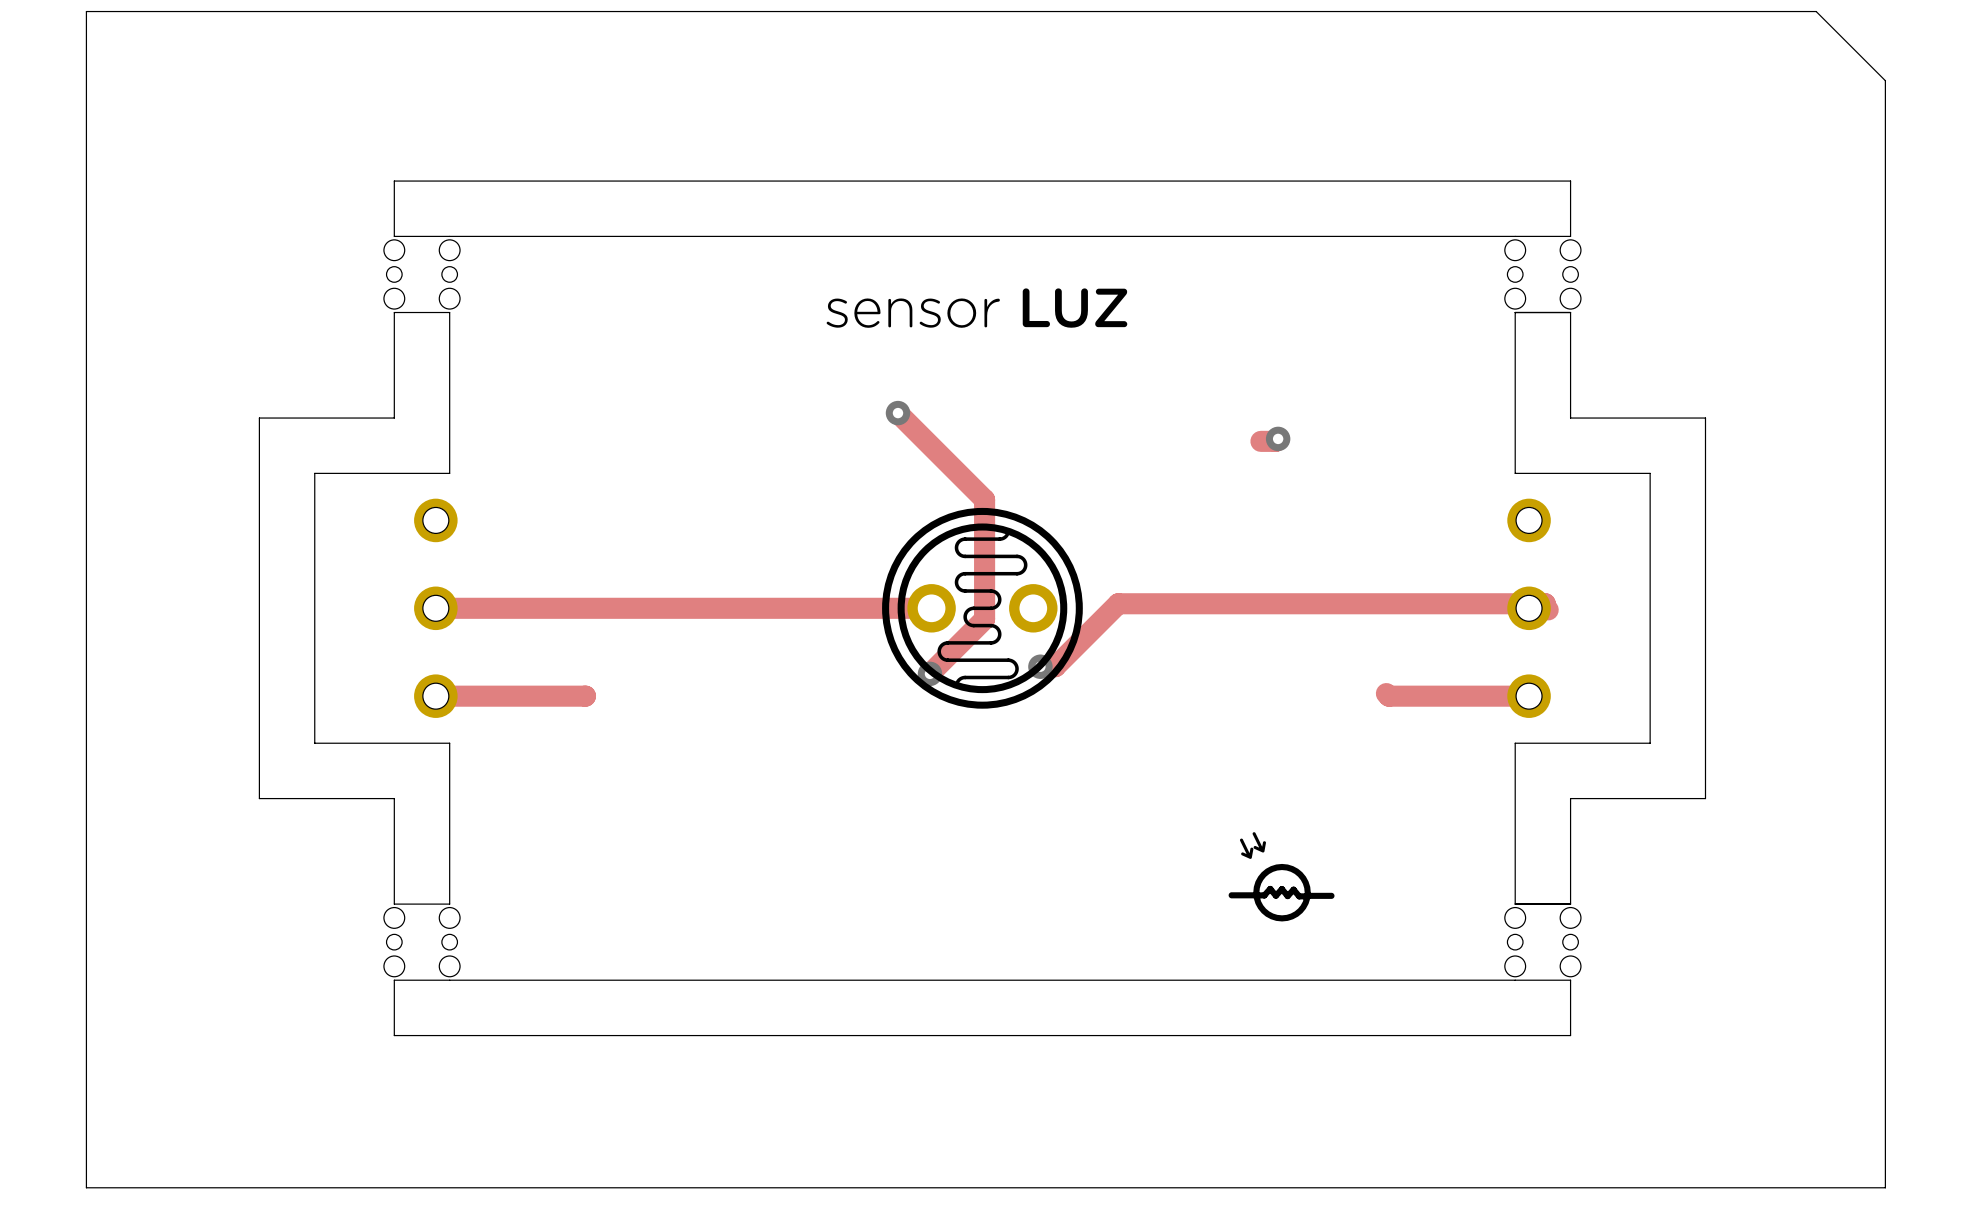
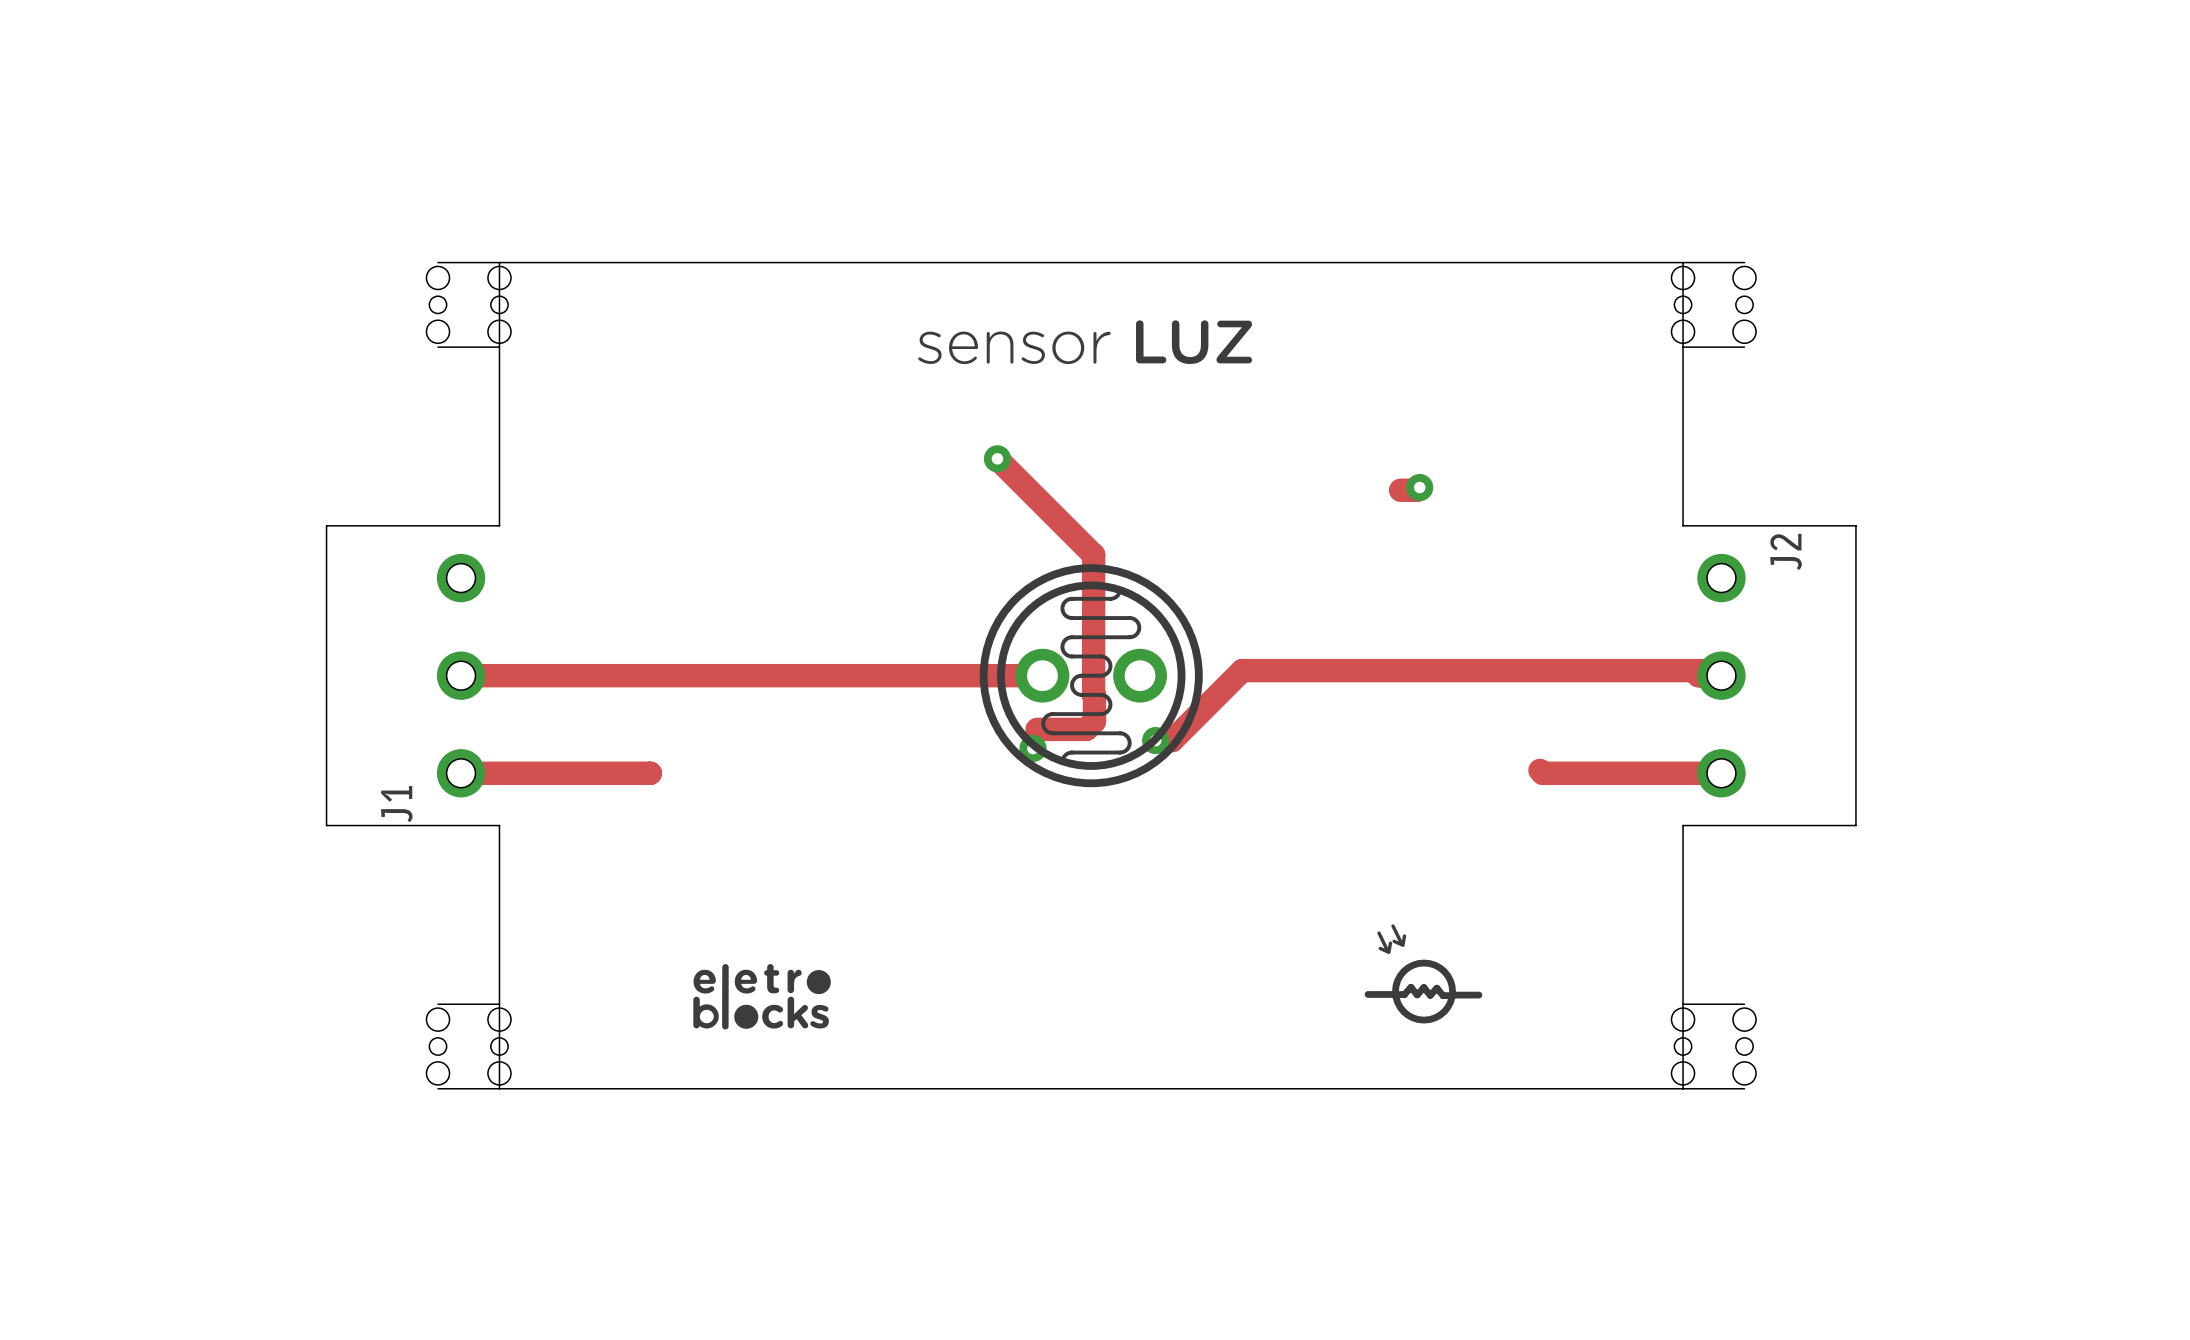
board edge: (86, 11) (86, 1187) (1885, 1187) (1885, 80) (1816, 11) (86, 11) -> none
board edge: (394, 236) (394, 181) (1570, 181) (1570, 236) -> none
board edge: none -> (499, 262) (499, 347)
board edge: (394, 312) (394, 418) (259, 418) (259, 798) (394, 798) (394, 904) -> none
board edge: (1515, 312) (1570, 312) (1570, 418) (1705, 418) (1705, 798) (1570, 798) (1570, 904) (1515, 904) -> (1683, 347) (1683, 262)
board edge: (314, 473) (314, 743) -> (349, 525) (326, 525) (326, 825) (349, 825)
board edge: (1650, 473) (1650, 743) -> (1832, 525) (1855, 525) (1855, 825) (1832, 825)
J2 name: none -> J2 (1786, 551)
part footprint: [882, 507, 1083, 709] -> [979, 564, 1203, 788]
J1 position: (435, 608) -> (461, 675)
J2 position: (1529, 608) -> (1721, 675)
track: (984, 619) (929, 673) -> (1093, 687) (1094, 721) (1086, 729) (1037, 729)
J1 name: none -> J1 (396, 804)
drawing: none -> [693, 964, 831, 1030]
board edge: none -> (499, 1004) (499, 1088)
board edge: none -> (1683, 1004) (1683, 1088)
board edge: (394, 980) (394, 1035) (1570, 1035) (1570, 980) -> none

